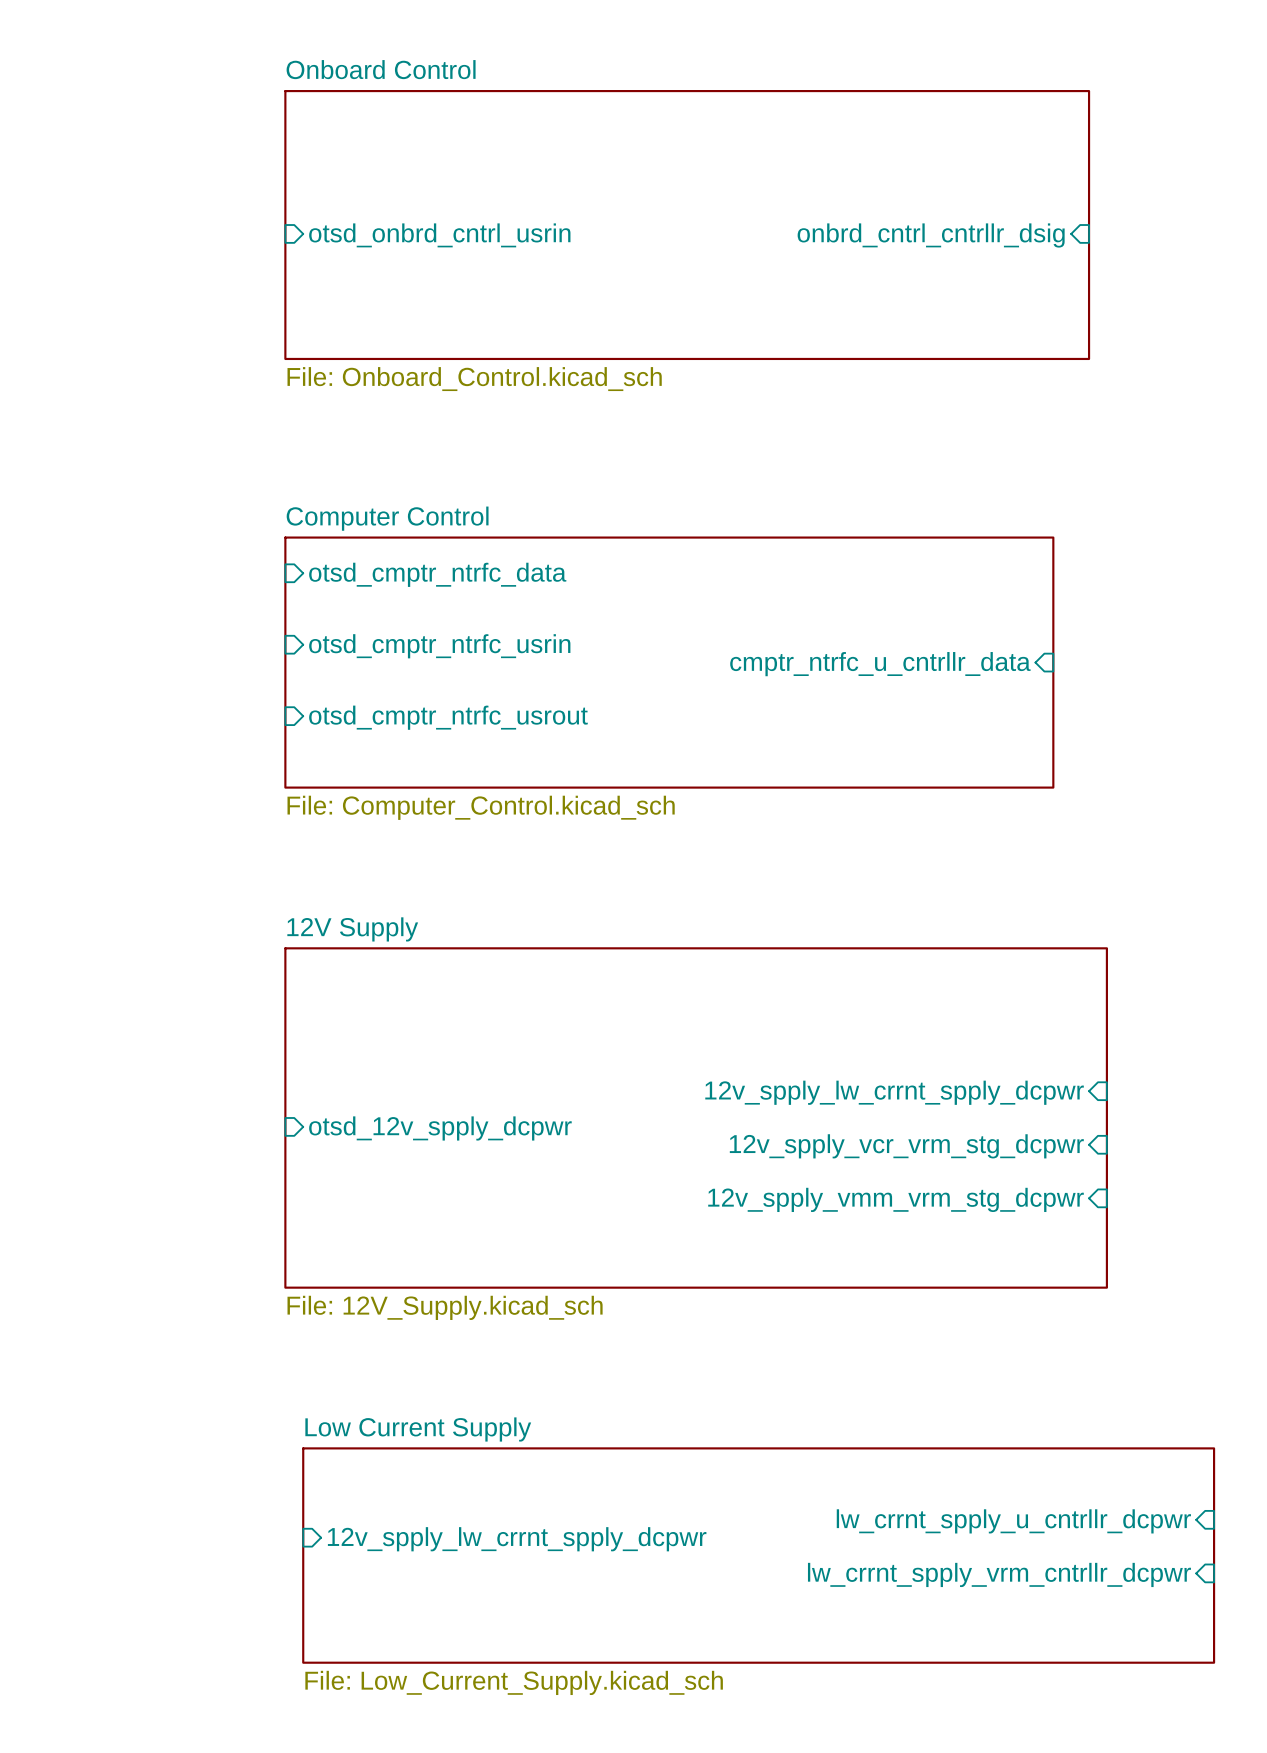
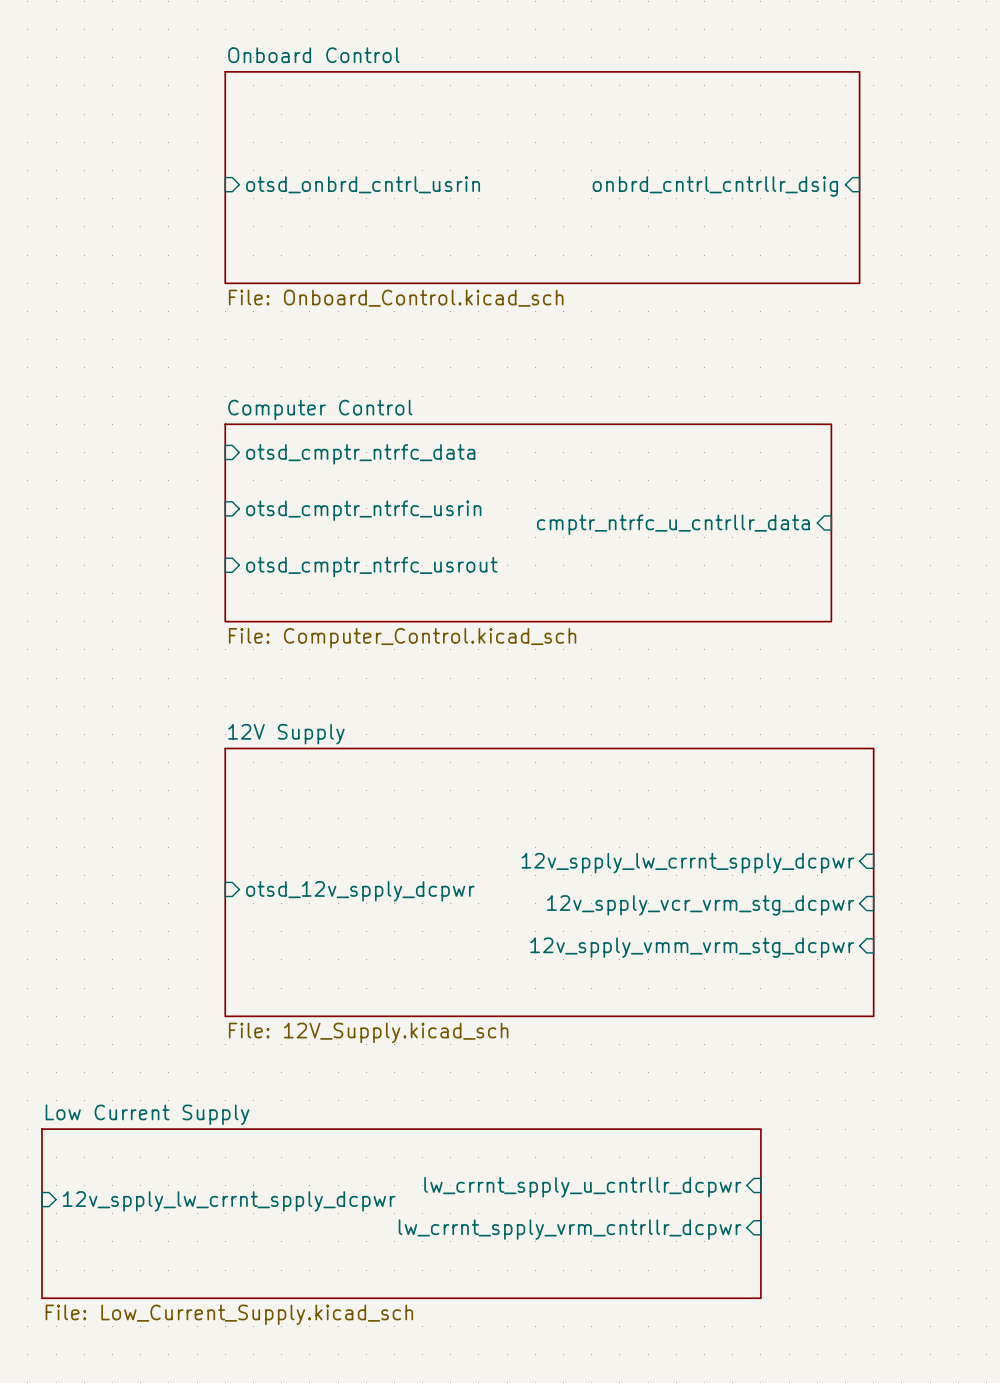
sheet pin position: lw_crrnt_spply_u_cntrllr_dcpwr (1013, 1521) -> lw_crrnt_spply_u_cntrllr_dcpwr (582, 1187)
sheet pin position: 12v_spply_lw_crrnt_spply_dcpwr (517, 1539) -> 12v_spply_lw_crrnt_spply_dcpwr (229, 1201)
sheet Low Current Supply position: (758, 1555) -> (401, 1213)
sheet pin position: lw_crrnt_spply_vrm_cntrllr_dcpwr (999, 1574) -> lw_crrnt_spply_vrm_cntrllr_dcpwr (570, 1229)

